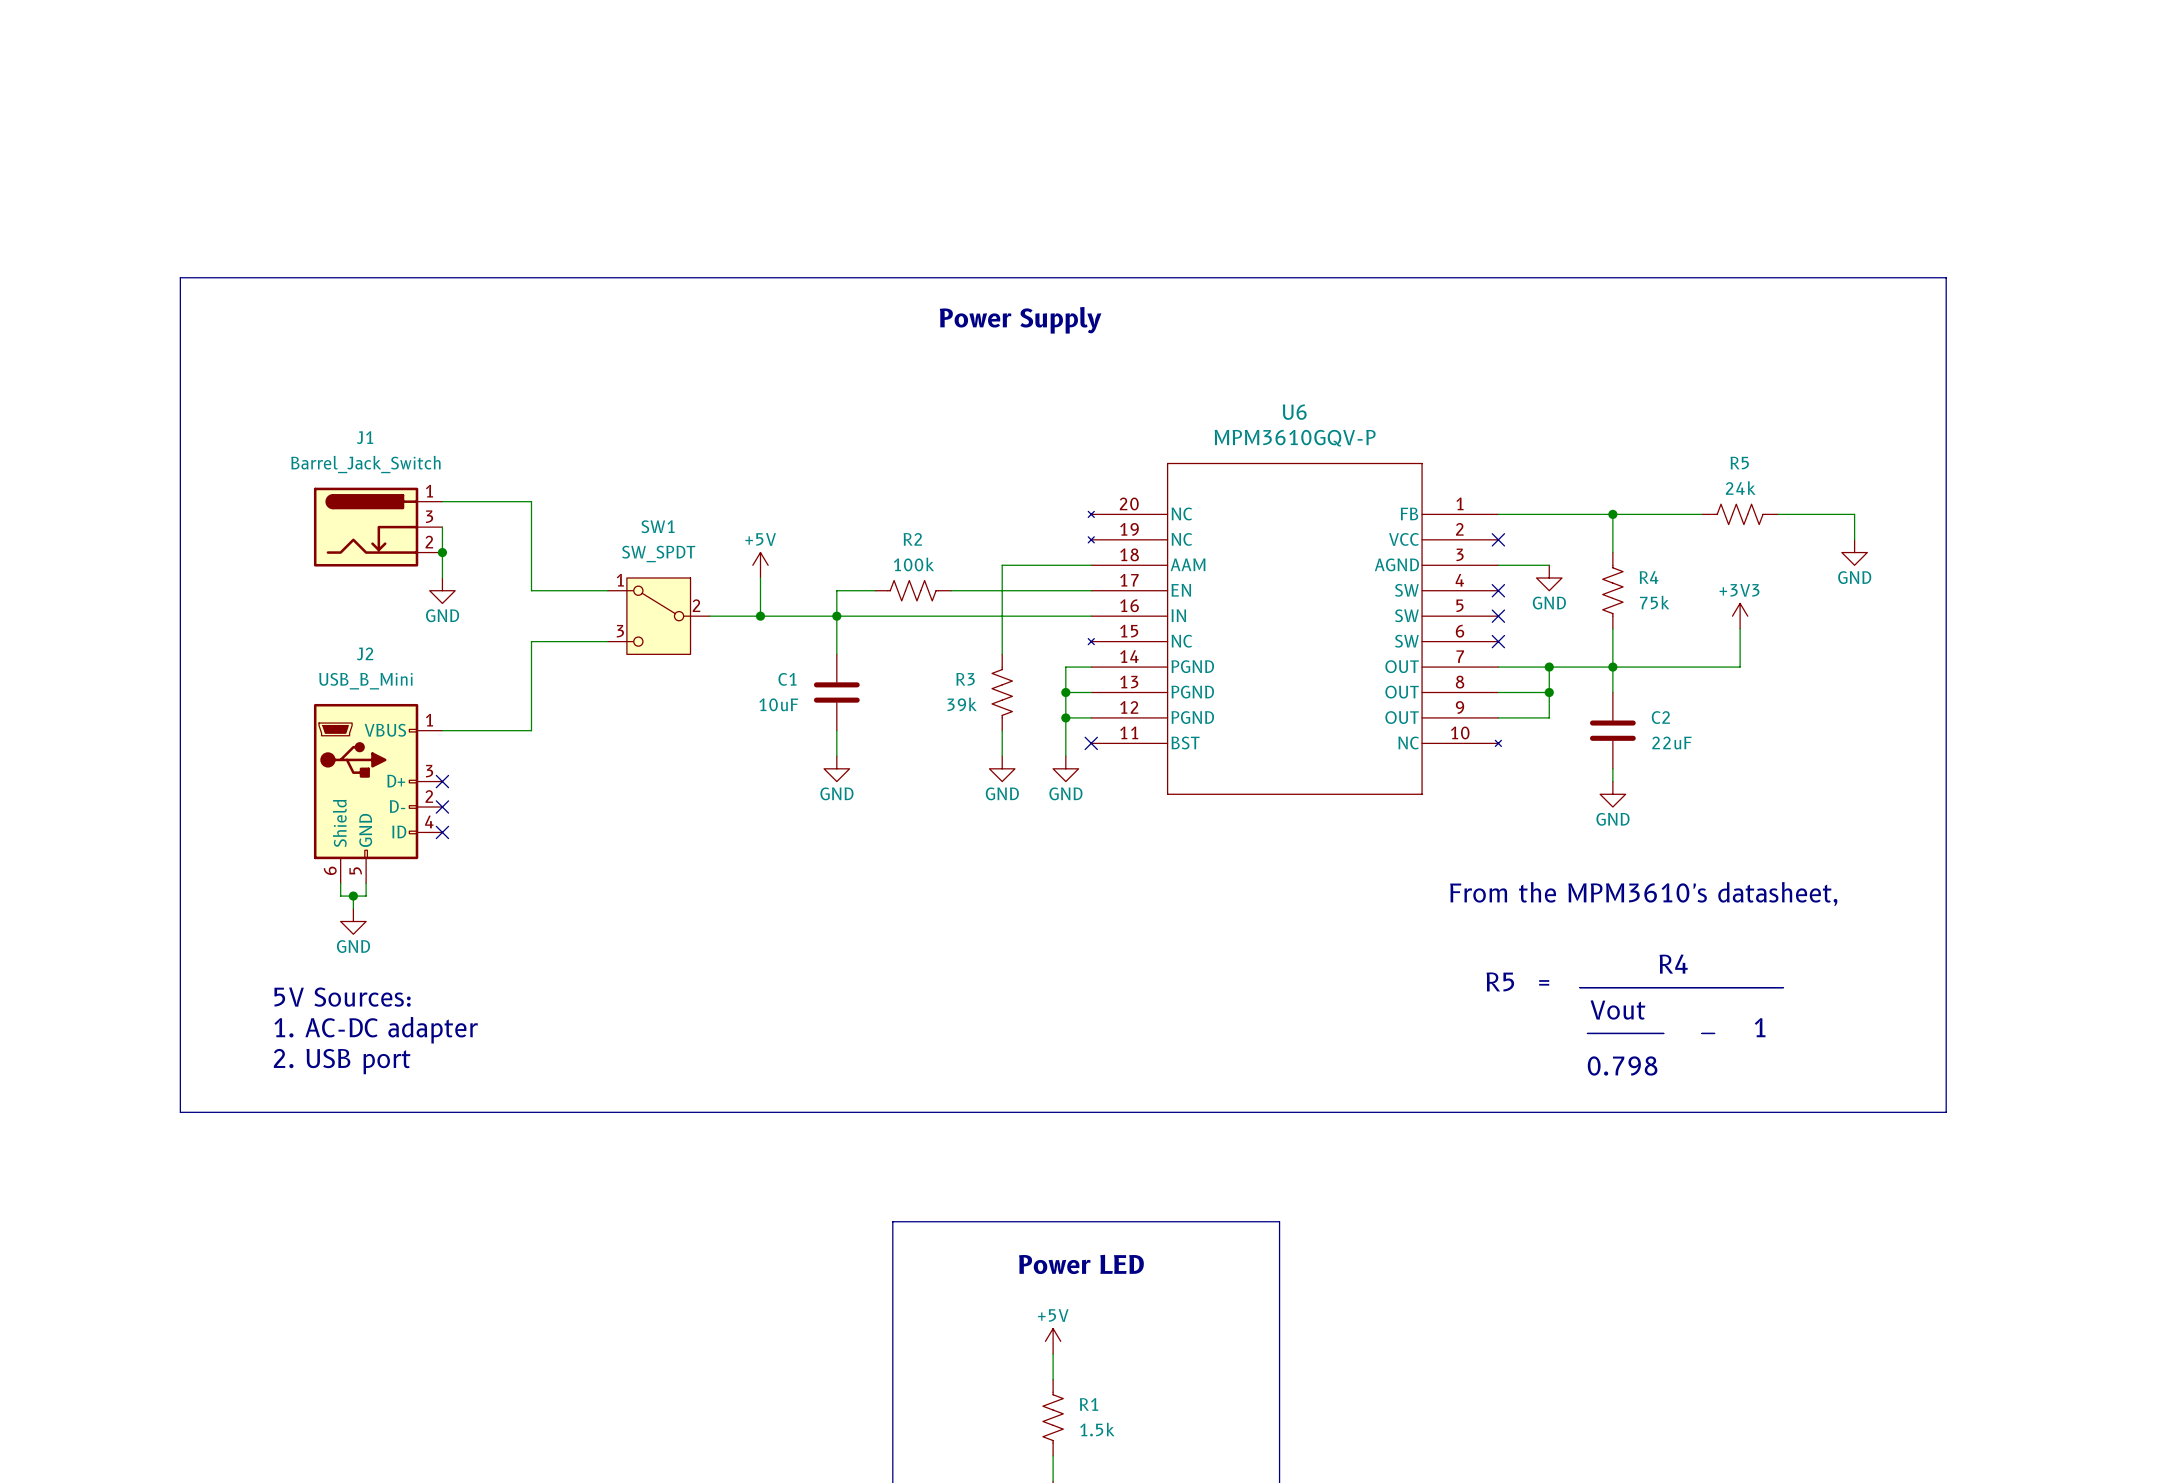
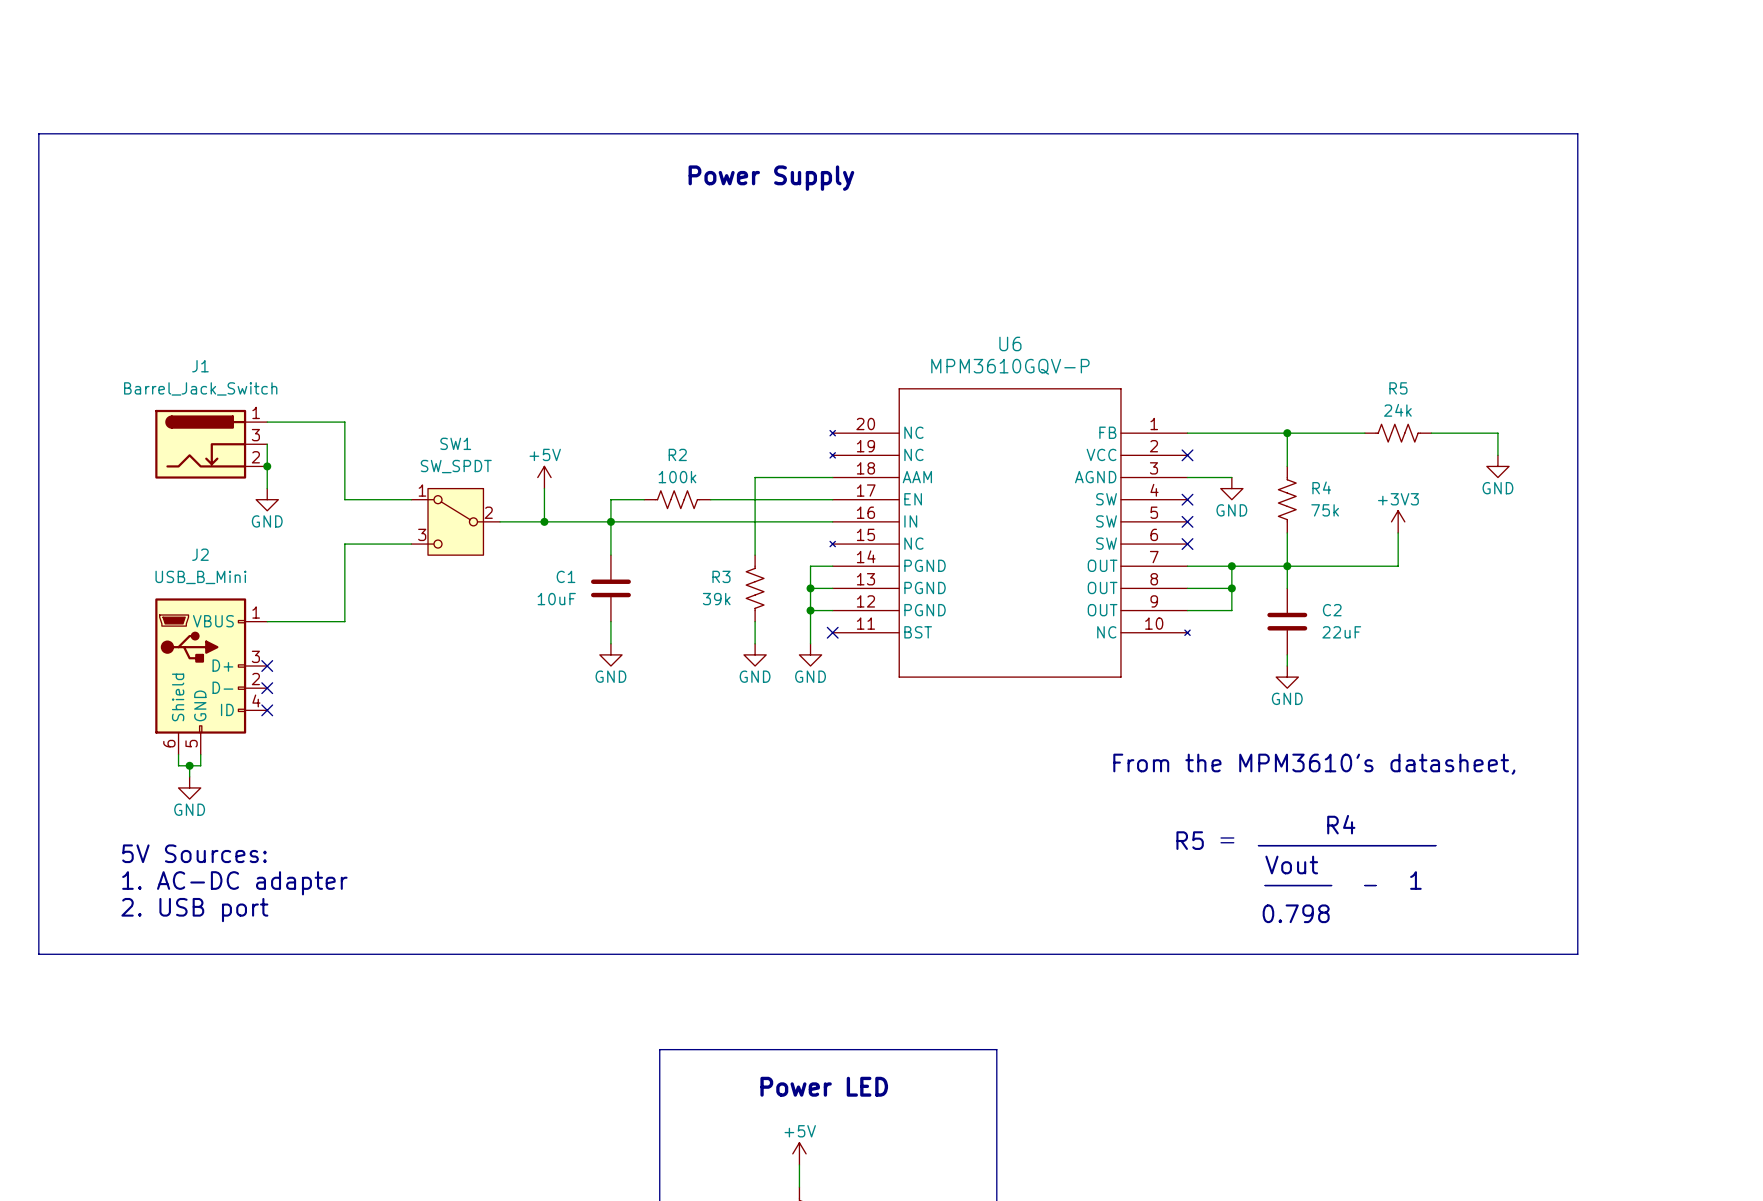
line: (180, 277) (1946, 277) -> (38, 226) (38, 133) (1577, 133) (1577, 226)
text position: Power Supply (1020, 320) -> Power Supply (771, 178)

